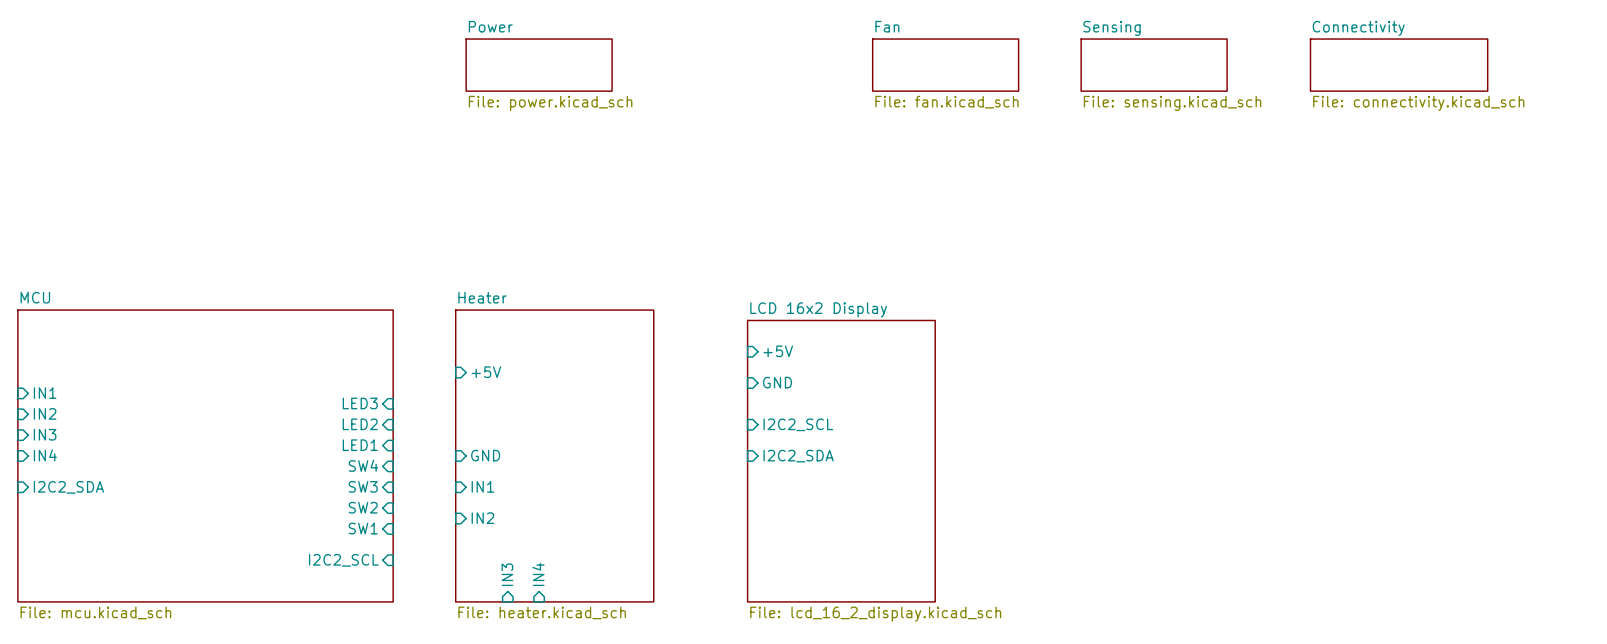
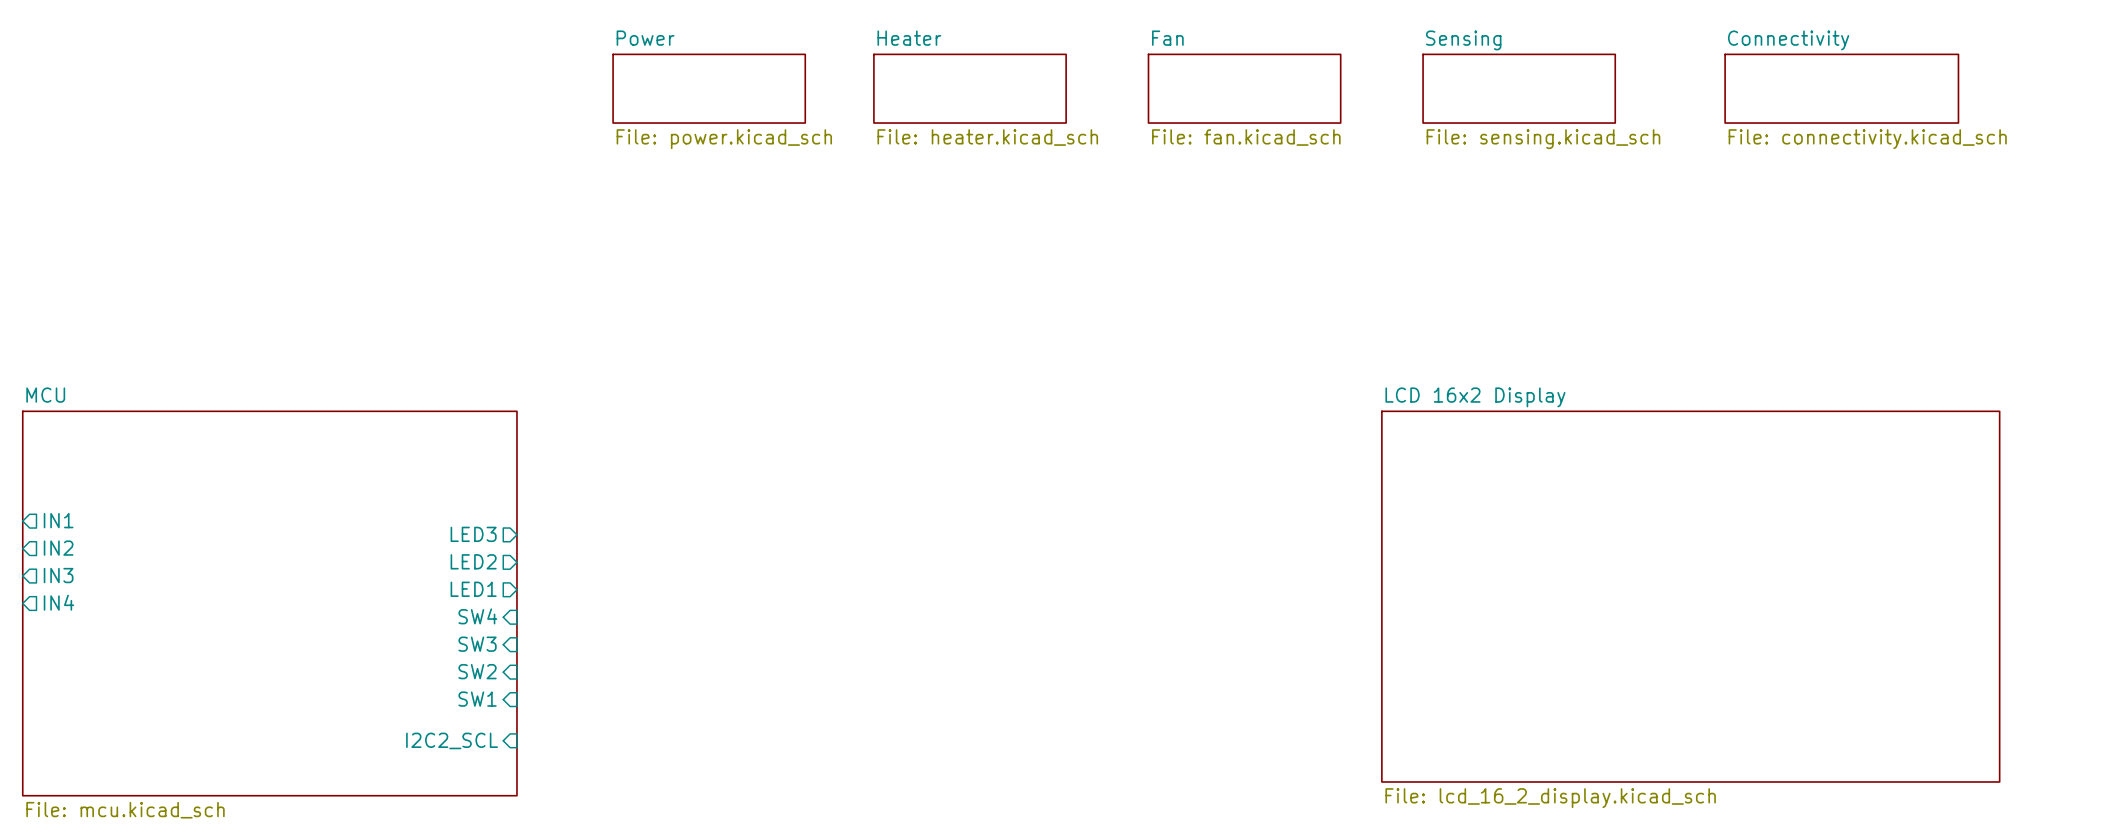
sheet Heater: none -> File: heater.kicad_sch (970, 88)
sheet LCD 16x2 Display name position: LCD 16x2 Display (818, 309) -> LCD 16x2 Display (1475, 397)
sheet LCD 16x2 Display shape: [746, 319, 936, 603] -> [1381, 410, 2001, 783]
sheet pin: +5V (778, 351) -> none
sheet pin: +5V (486, 372) -> none
sheet pin: GND (777, 382) -> none
sheet pin shape: input (45, 393) -> output (58, 520)
sheet pin shape: input (360, 403) -> output (473, 534)
sheet pin shape: input (45, 413) -> output (58, 548)
sheet pin shape: input (360, 424) -> output (473, 561)
sheet pin: I2C2_SCL (798, 424) -> none
sheet pin shape: input (45, 434) -> output (58, 575)
sheet pin shape: input (360, 445) -> output (473, 589)
sheet pin shape: input (45, 455) -> output (58, 602)
sheet pin: GND (485, 455) -> none
sheet Heater: File: heater.kicad_sch (554, 455) -> none
sheet pin: I2C2_SDA (798, 456) -> none
sheet pin: IN1 (482, 486) -> none
sheet pin: I2C2_SDA (68, 487) -> none
sheet pin: IN2 (482, 518) -> none
sheet pin: IN3 (507, 574) -> none
sheet pin: IN4 (538, 574) -> none
sheet LCD 16x2 Display value position: File: lcd_16_2_display.kicad_sch (875, 614) -> File: lcd_16_2_display.kicad_sch (1550, 798)

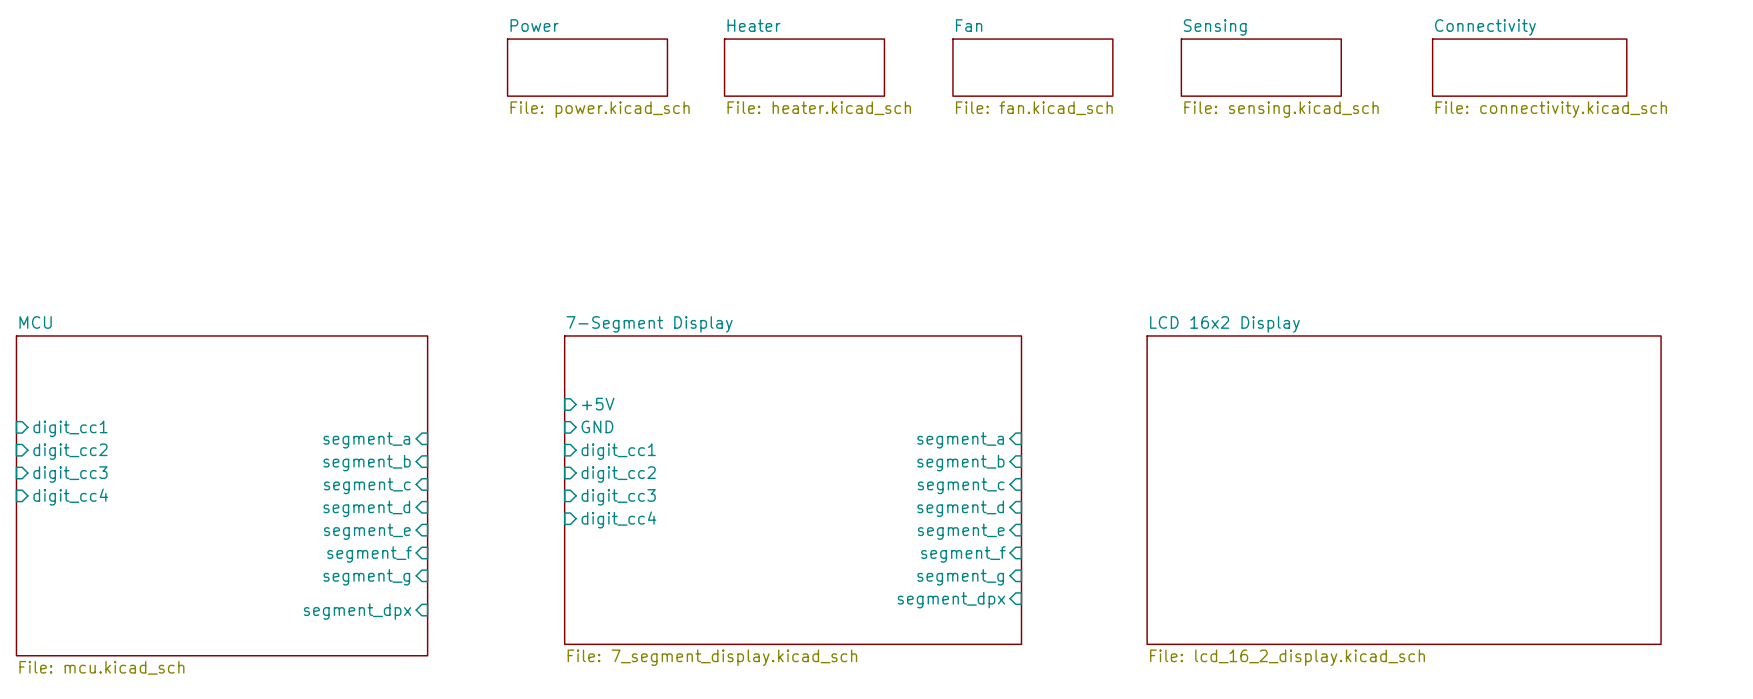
sheet pin: none -> +5V (598, 404)
sheet pin shape: output (58, 520) -> input (70, 428)
sheet pin: IN1 (58, 520) -> digit_cc1 (70, 428)
sheet pin: none -> GND (597, 426)
sheet pin shape: output (473, 534) -> input (366, 440)
sheet pin: LED3 (473, 534) -> segment_a (366, 440)
sheet pin: none -> segment_a (960, 440)
sheet pin shape: output (58, 548) -> input (70, 451)
sheet pin: IN2 (58, 548) -> digit_cc2 (70, 451)
sheet pin: none -> digit_cc1 (618, 451)
sheet pin shape: output (473, 561) -> input (367, 463)
sheet pin: LED2 (473, 561) -> segment_b (367, 463)
sheet pin: none -> segment_b (960, 463)
sheet pin shape: output (58, 575) -> input (70, 474)
sheet pin: IN3 (58, 575) -> digit_cc3 (70, 474)
sheet pin: none -> digit_cc2 (618, 474)
sheet pin shape: output (473, 589) -> input (367, 485)
sheet pin: LED1 (473, 589) -> segment_c (367, 485)
sheet pin: none -> segment_c (961, 485)
sheet 7-Segment Display: none -> File: 7_segment_display.kicad_sch (793, 490)
sheet pin shape: output (58, 602) -> input (70, 497)
sheet pin: IN4 (58, 602) -> digit_cc4 (70, 497)
sheet pin: none -> digit_cc3 (618, 497)
sheet pin: SW4 (477, 616) -> segment_d (366, 508)
sheet pin: none -> segment_d (960, 508)
sheet pin: none -> digit_cc4 (618, 519)
sheet pin: SW3 (477, 644) -> segment_e (367, 531)
sheet pin: none -> segment_e (961, 531)
sheet pin: SW2 (477, 671) -> segment_f (369, 554)
sheet pin: none -> segment_f (963, 554)
sheet pin: SW1 (477, 699) -> segment_g (366, 577)
sheet pin: none -> segment_g (960, 577)
sheet pin: none -> segment_dpx (951, 600)
sheet pin: I2C2_SCL (452, 740) -> segment_dpx (357, 611)

